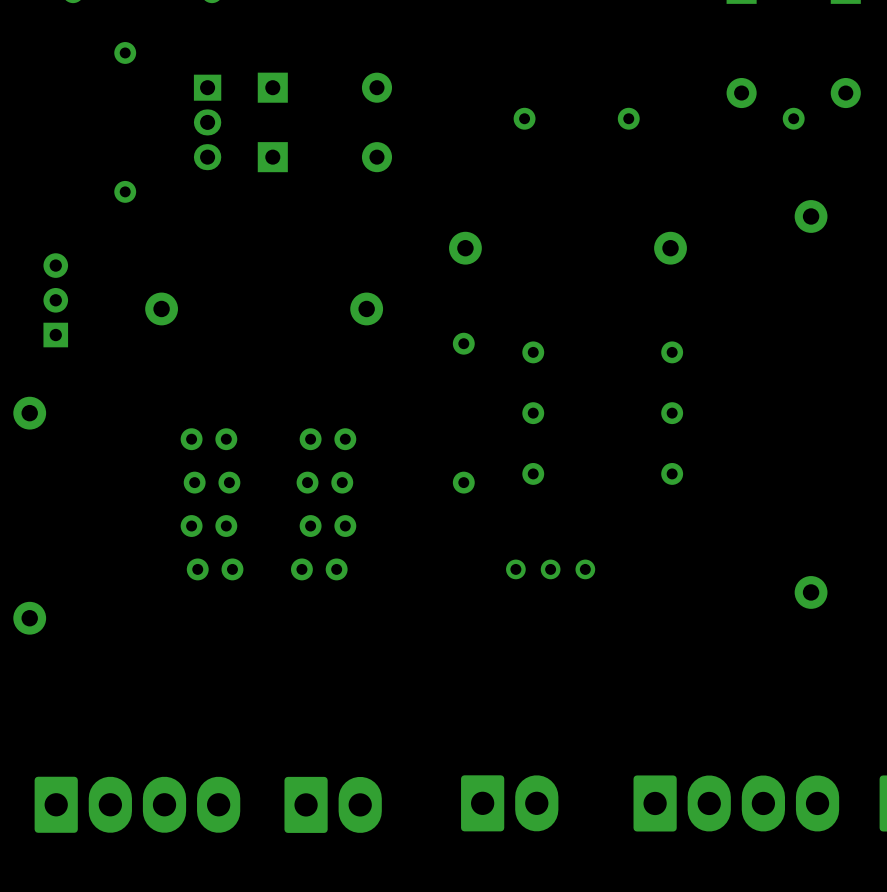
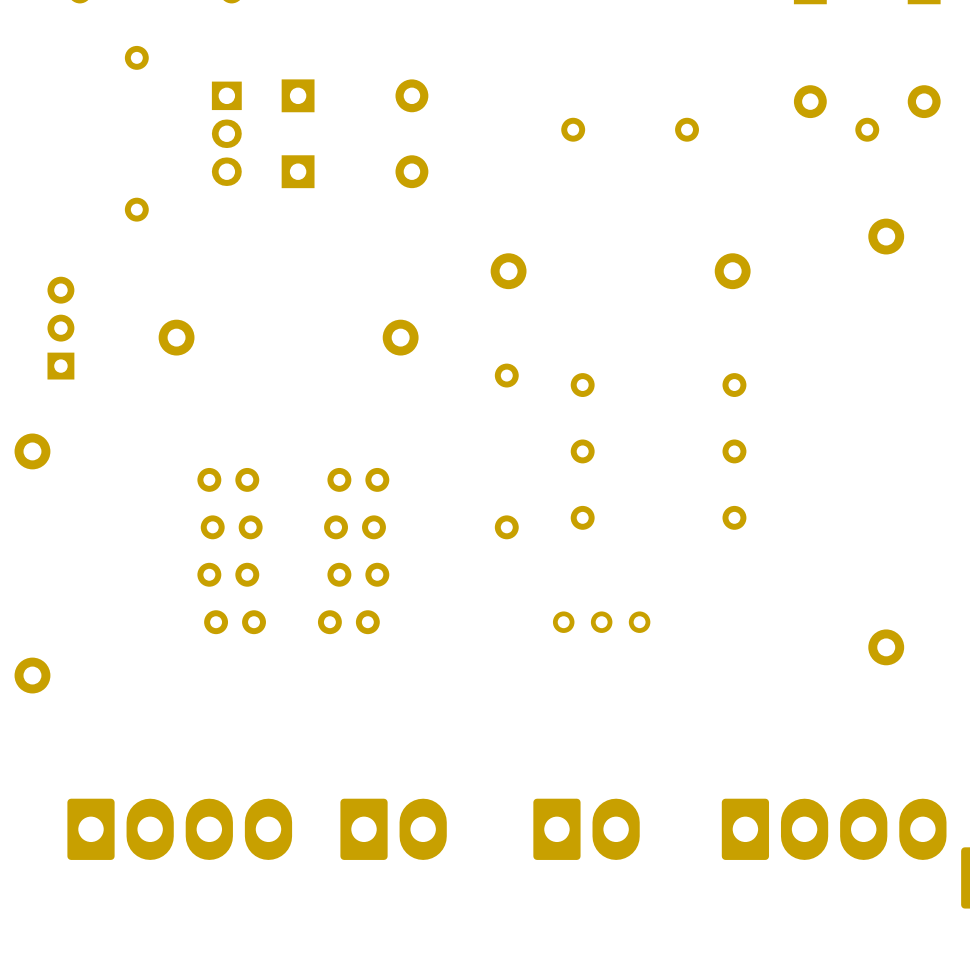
part position: (509, 803) -> (586, 829)
part position: (736, 803) -> (834, 829)
part position: (137, 804) -> (179, 829)
part position: (333, 804) -> (393, 829)

